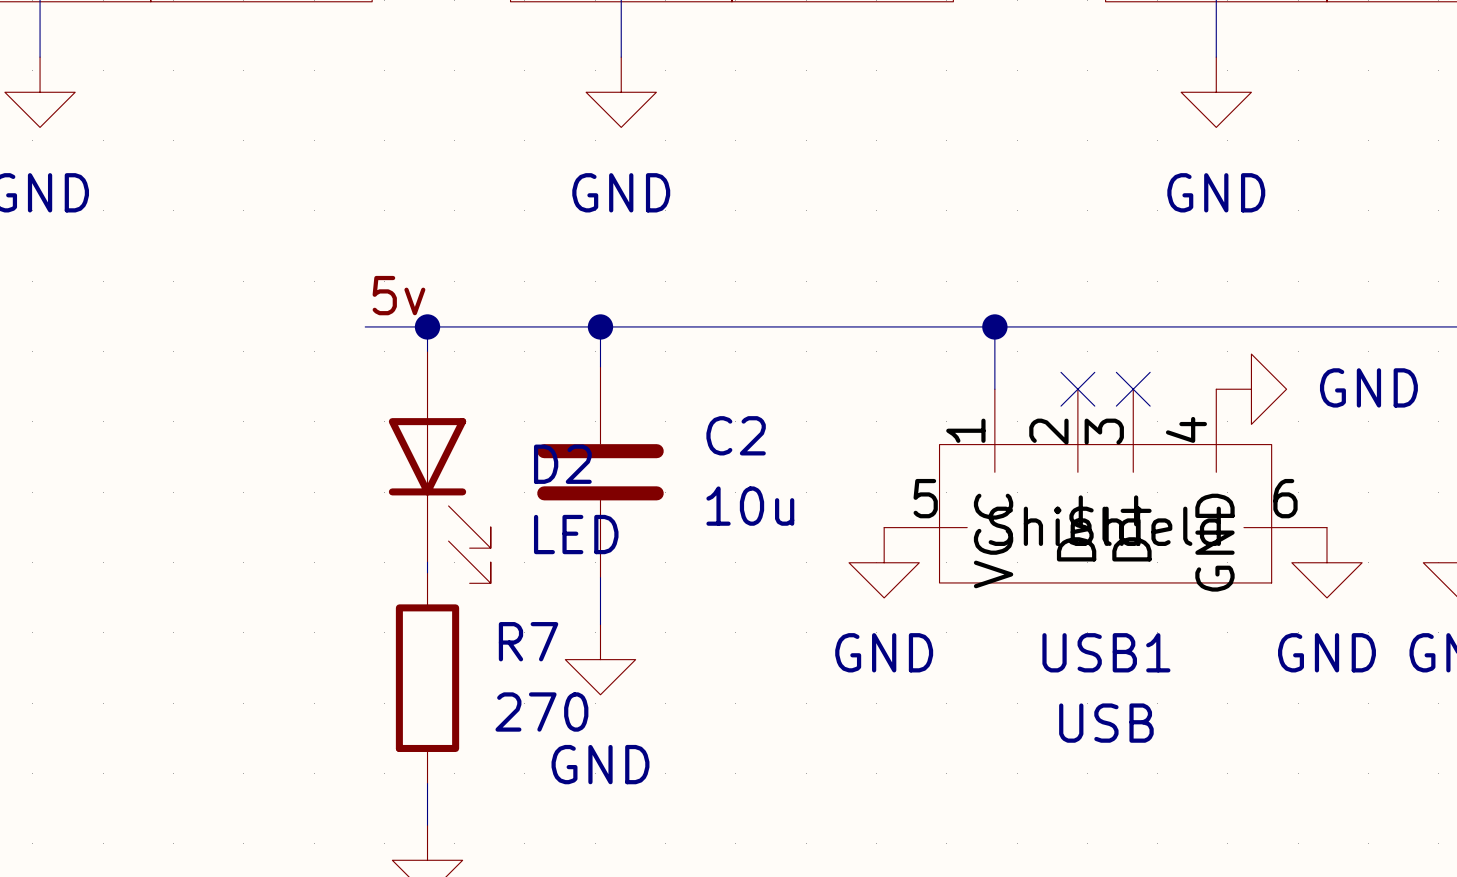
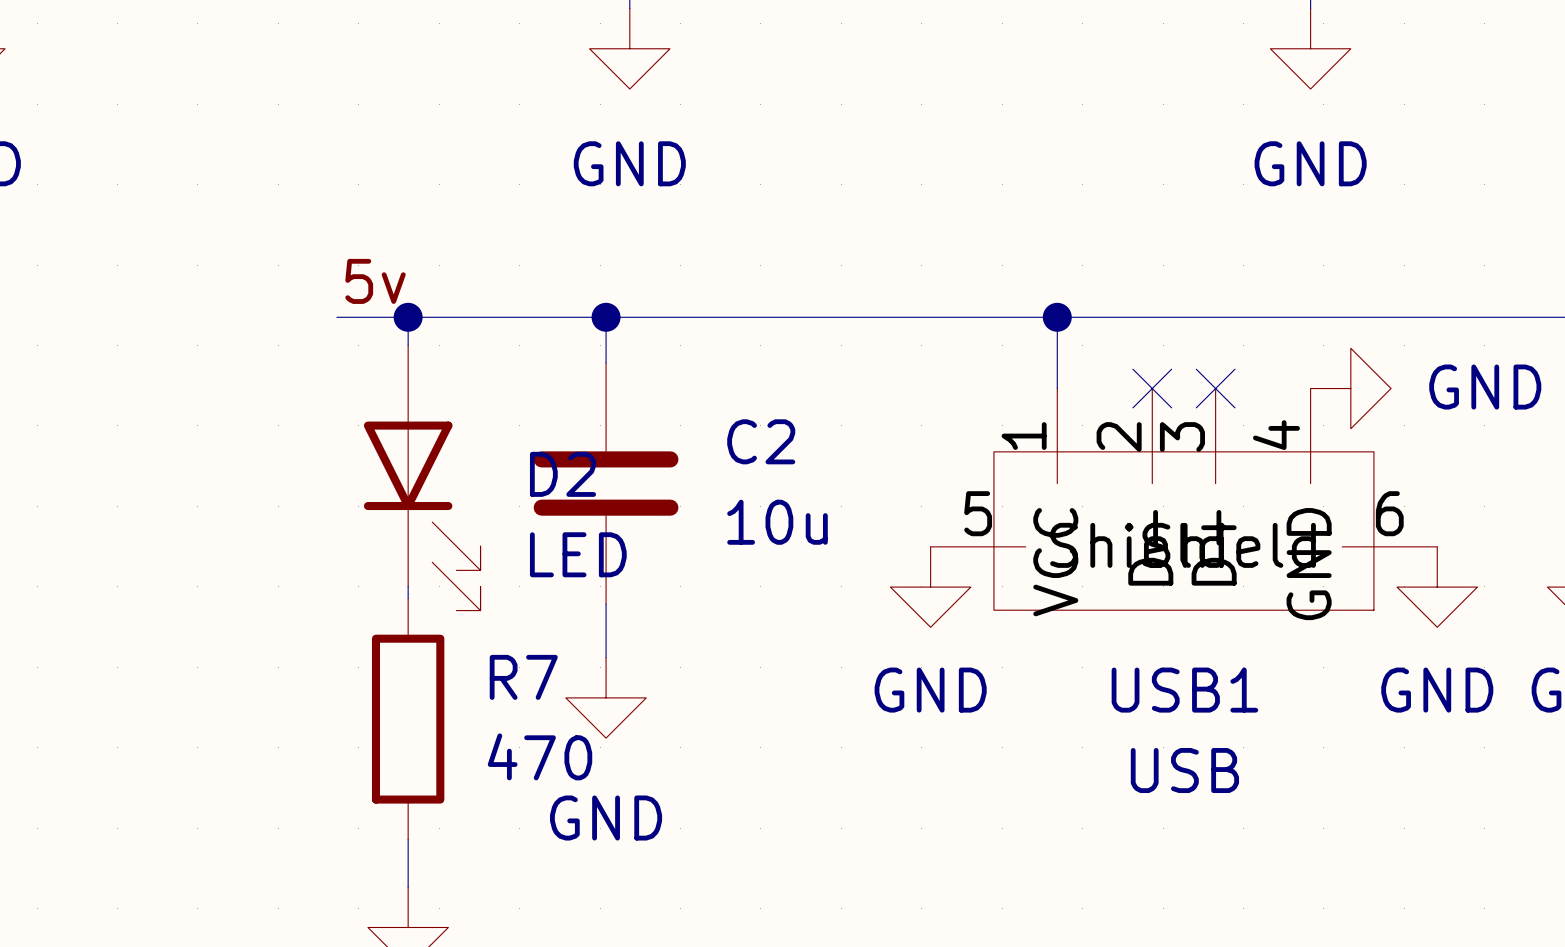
R7 value: 270 (541, 712) -> 470 (540, 756)

